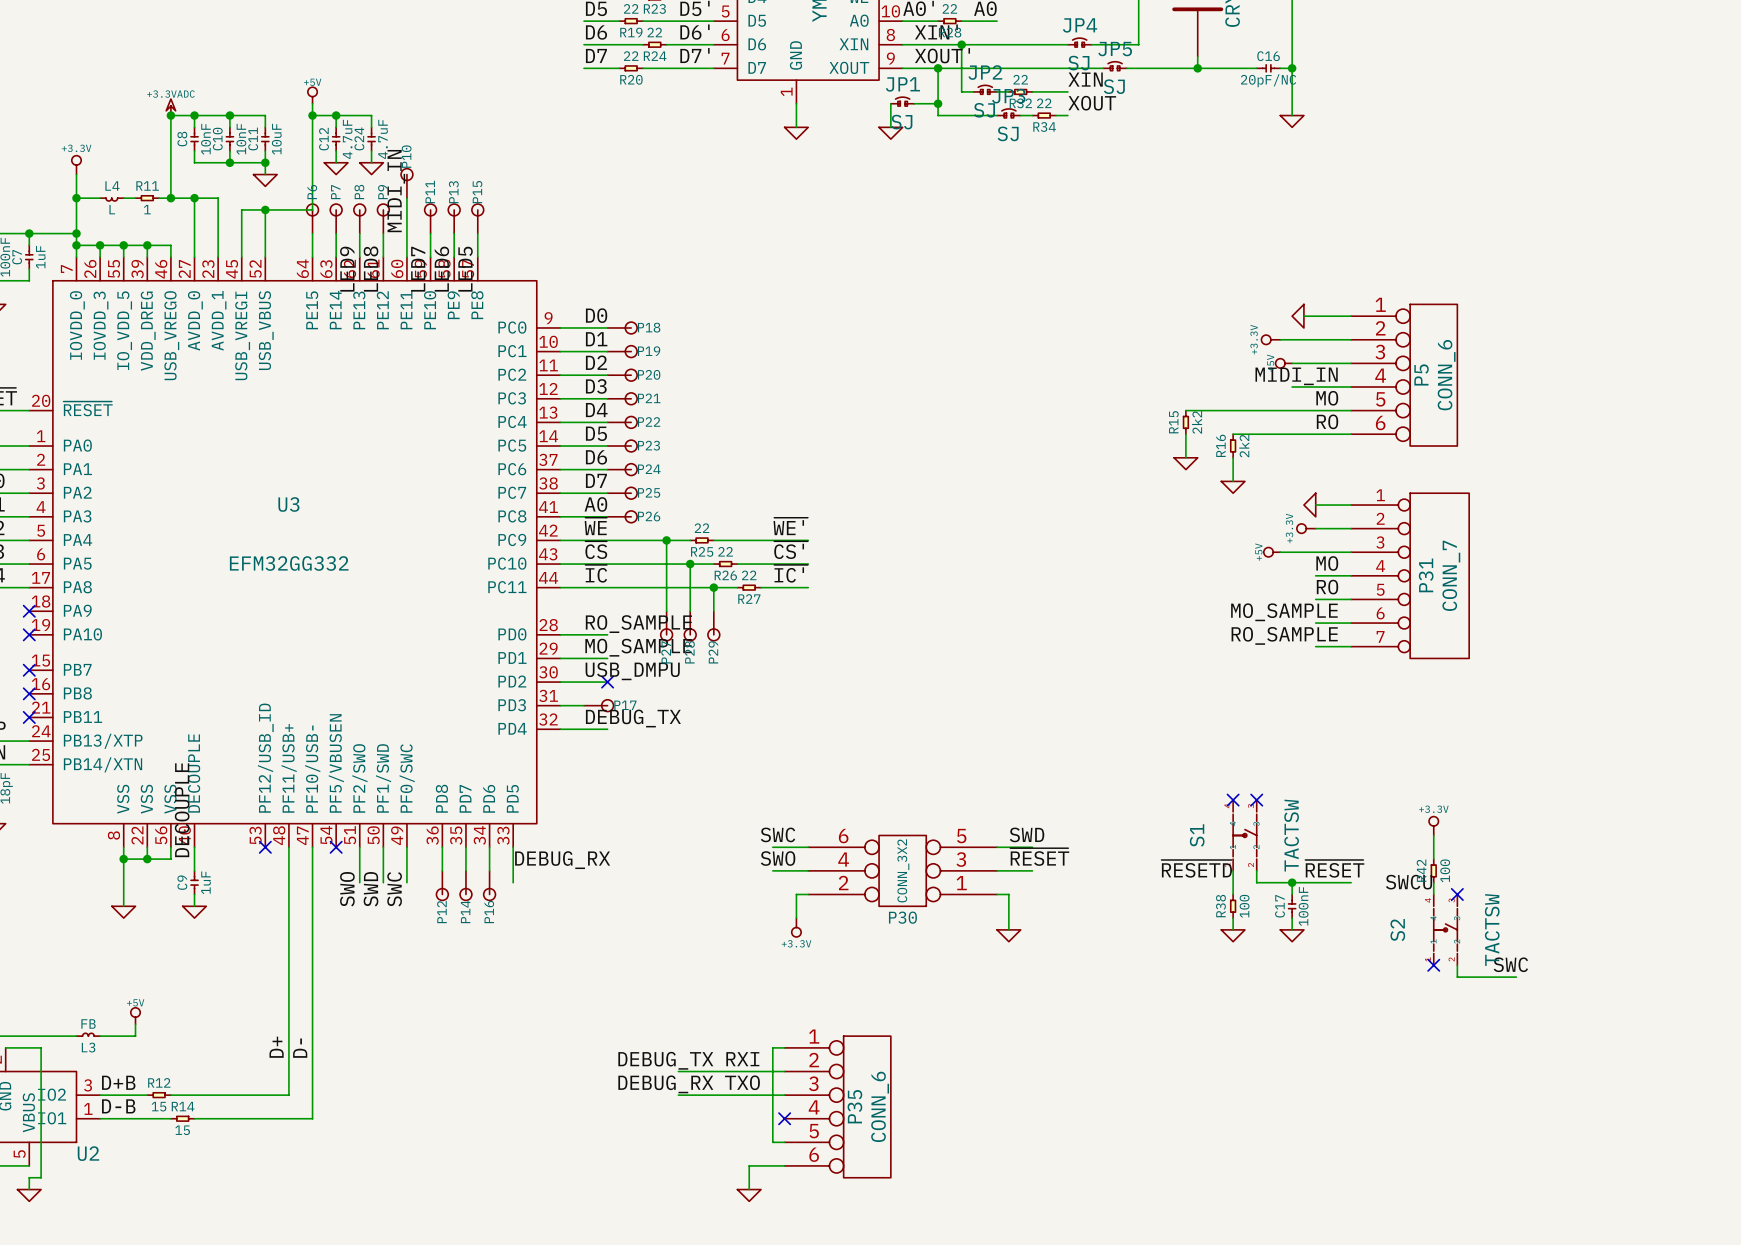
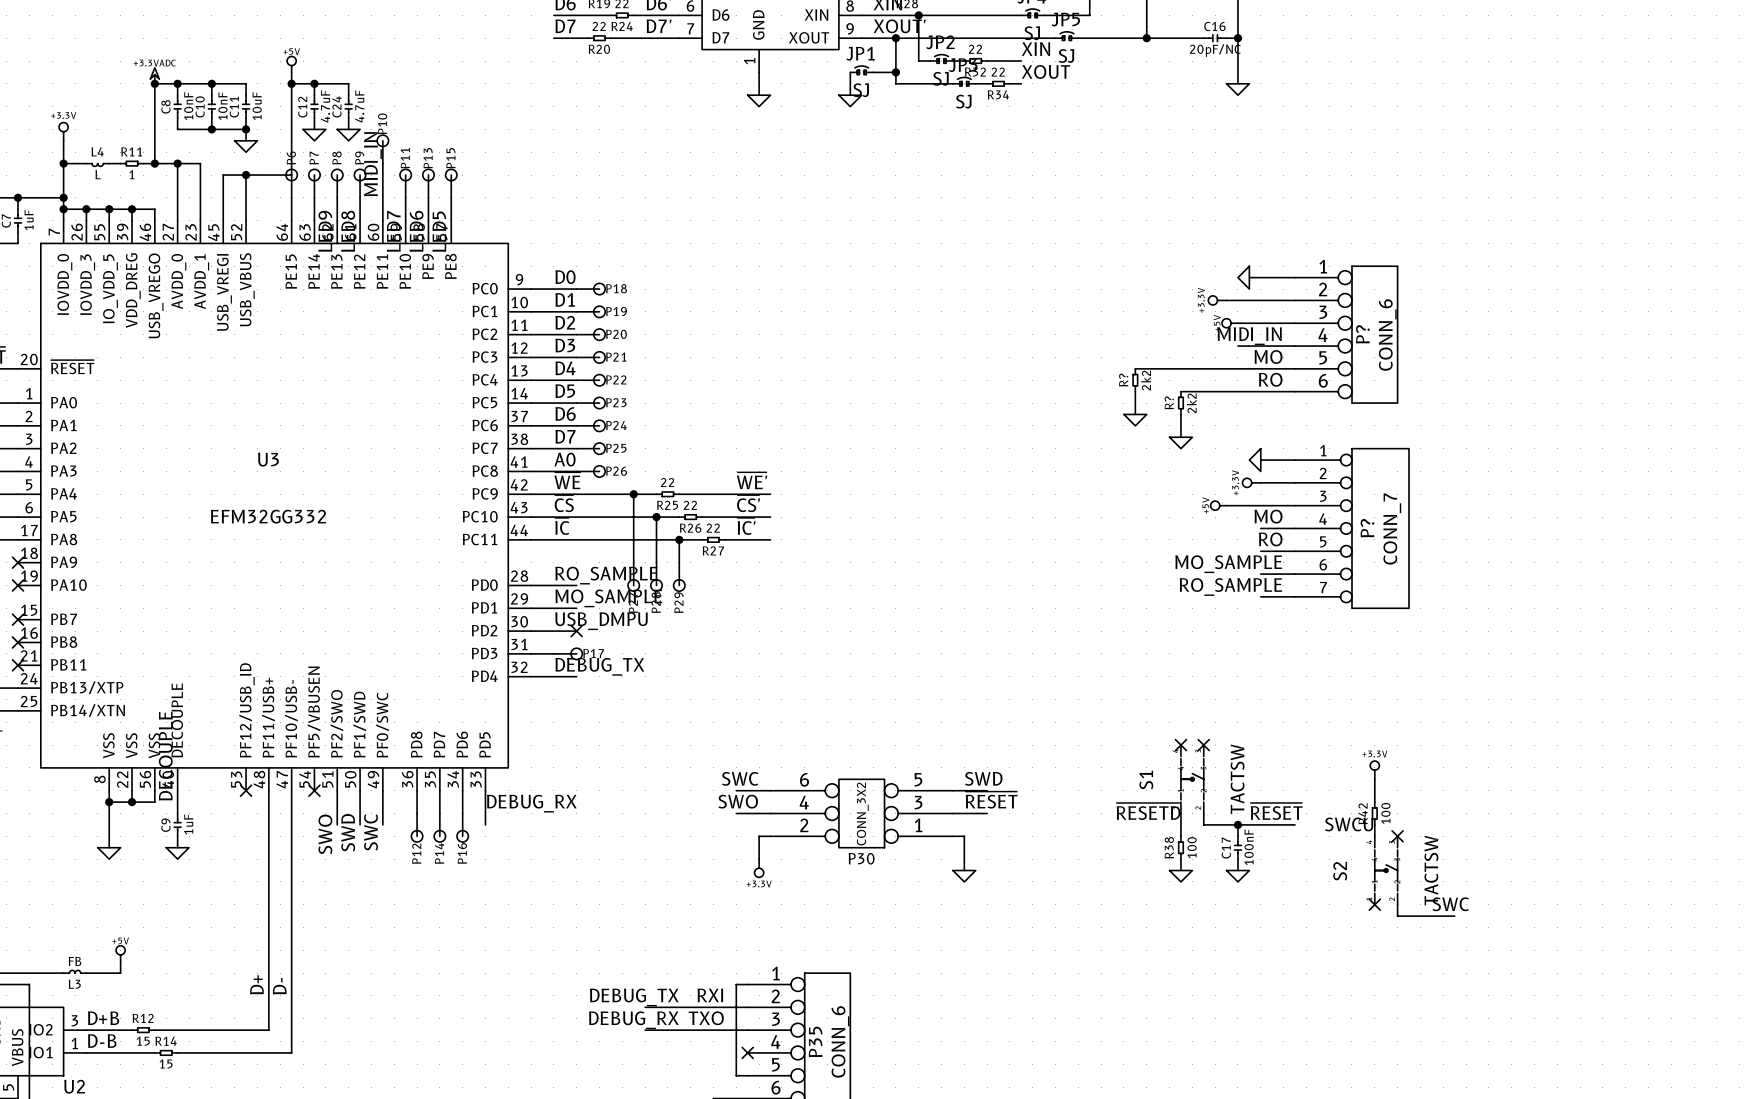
P5 name: P5 (1421, 374) -> P? (1362, 334)
R15 name: R15 (1173, 422) -> R? (1123, 380)
R16 name: R16 (1221, 445) -> R? (1169, 402)
P31 name: P31 (1426, 575) -> P? (1367, 528)

